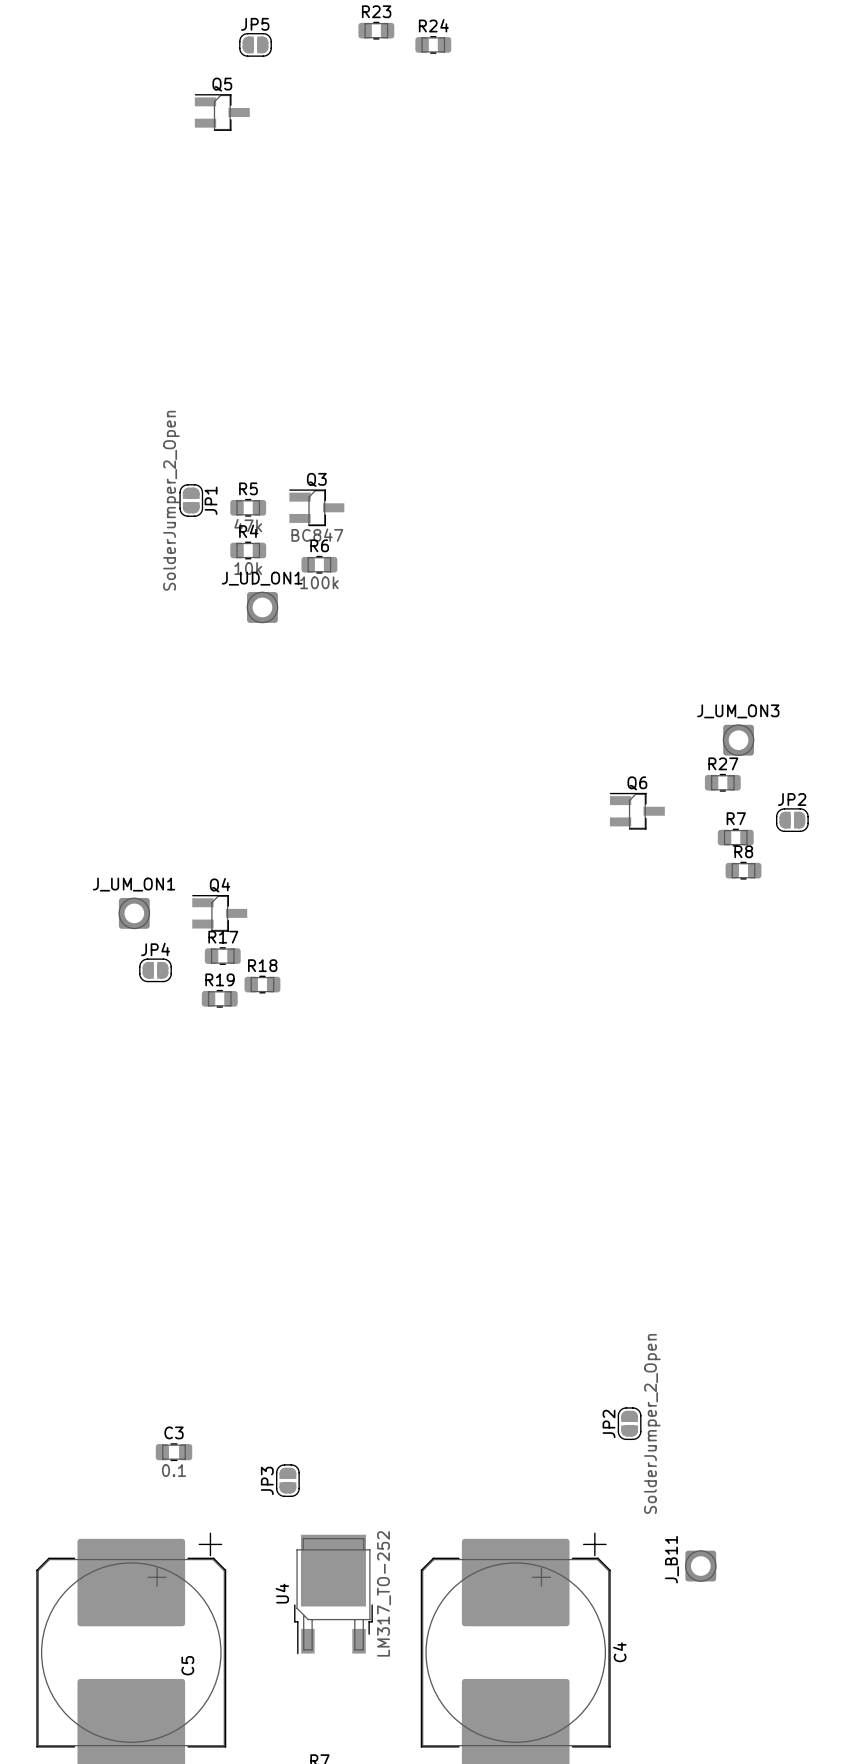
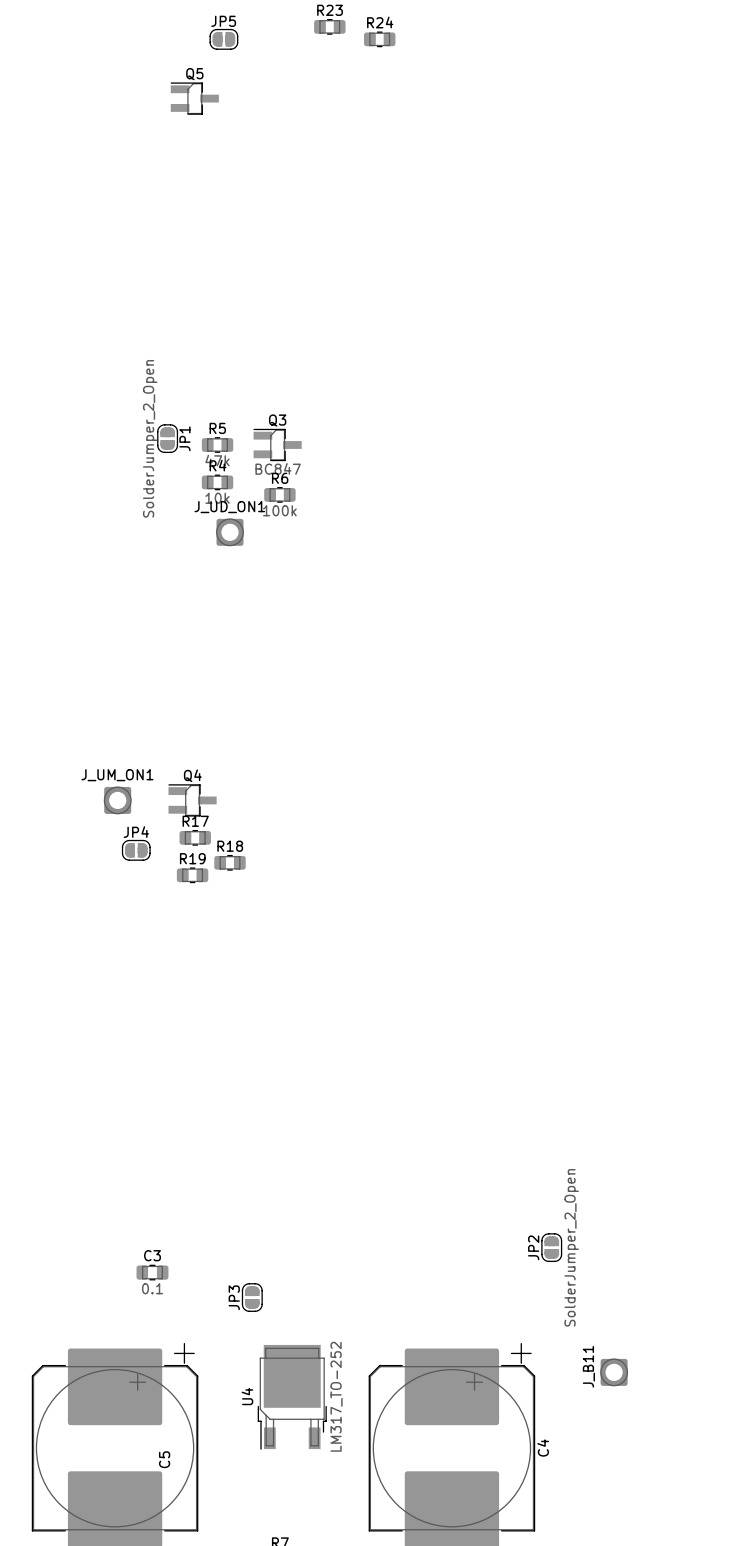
J_UM_ON3: (738, 740) -> none
R27: (722, 782) -> none
Q6: (637, 811) -> none
JP2: (792, 820) -> none
R7: (735, 837) -> none
R8: (743, 870) -> none

